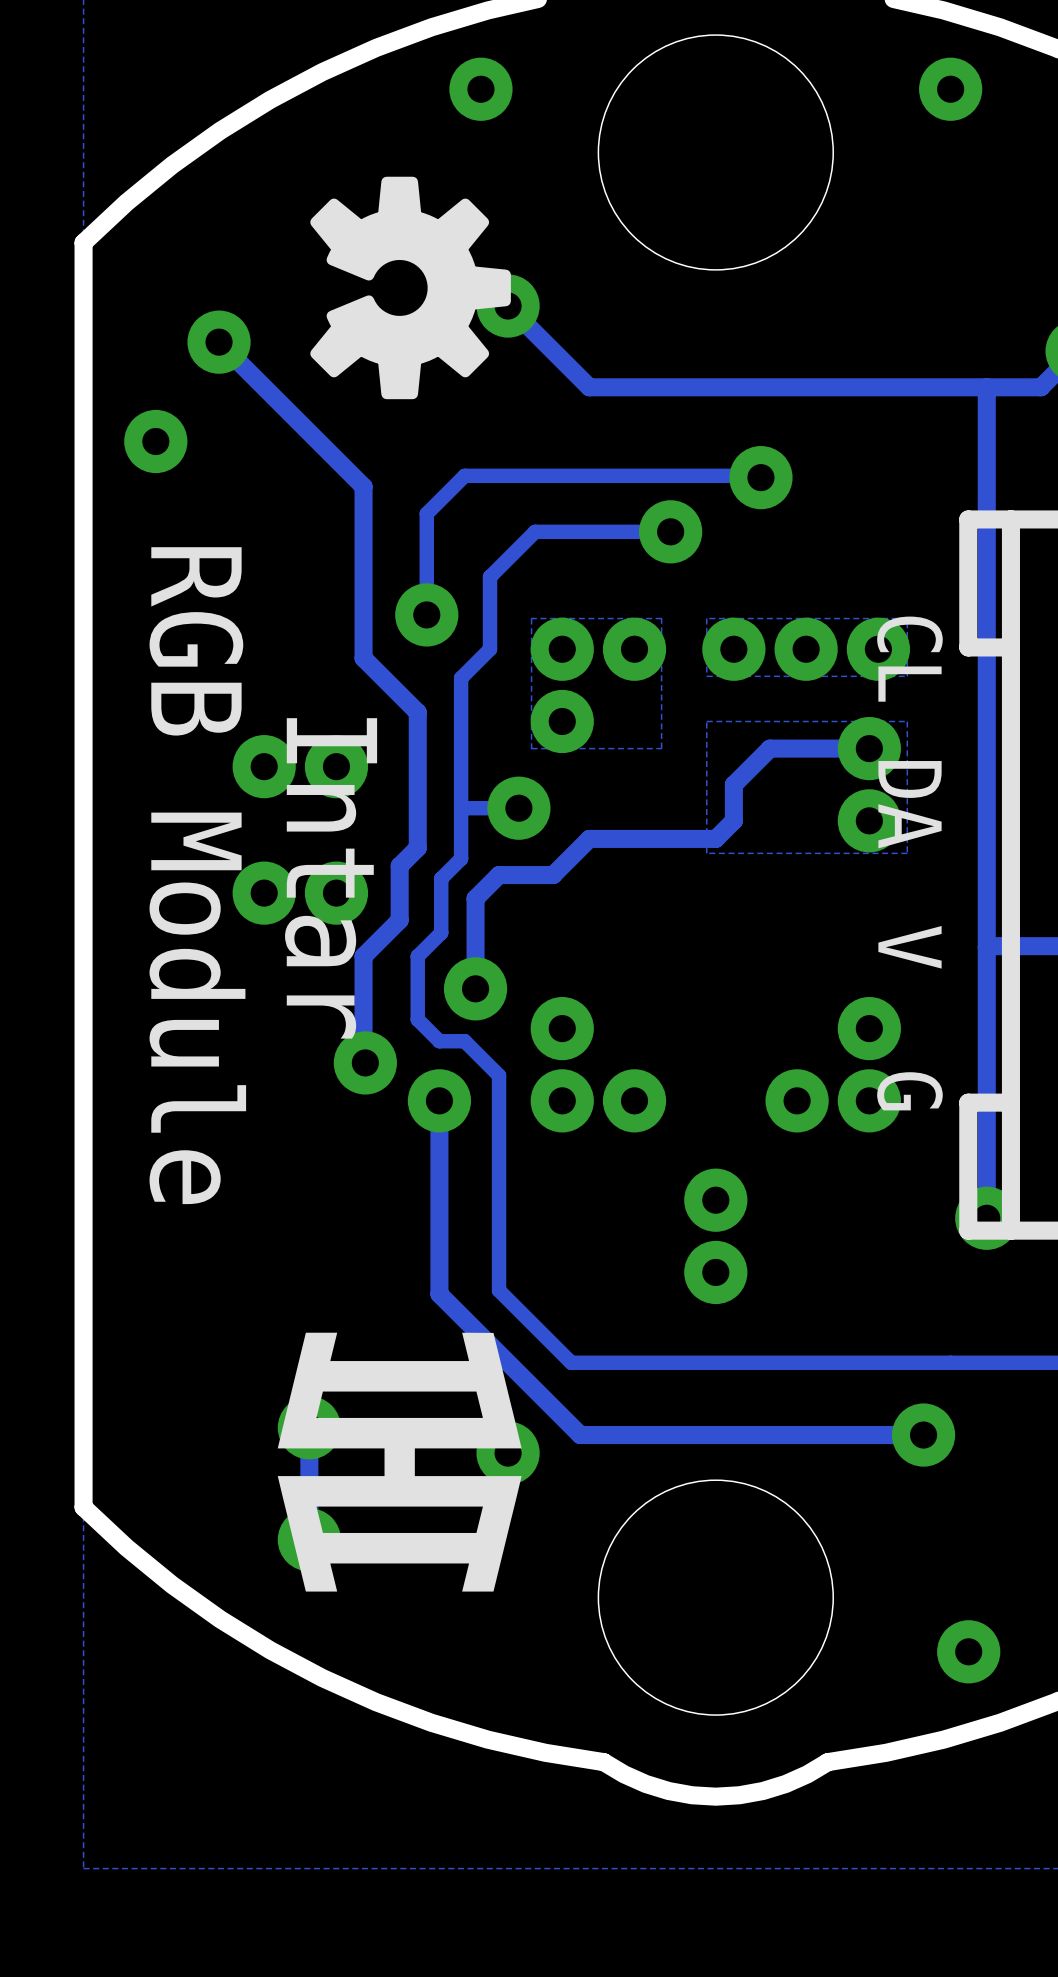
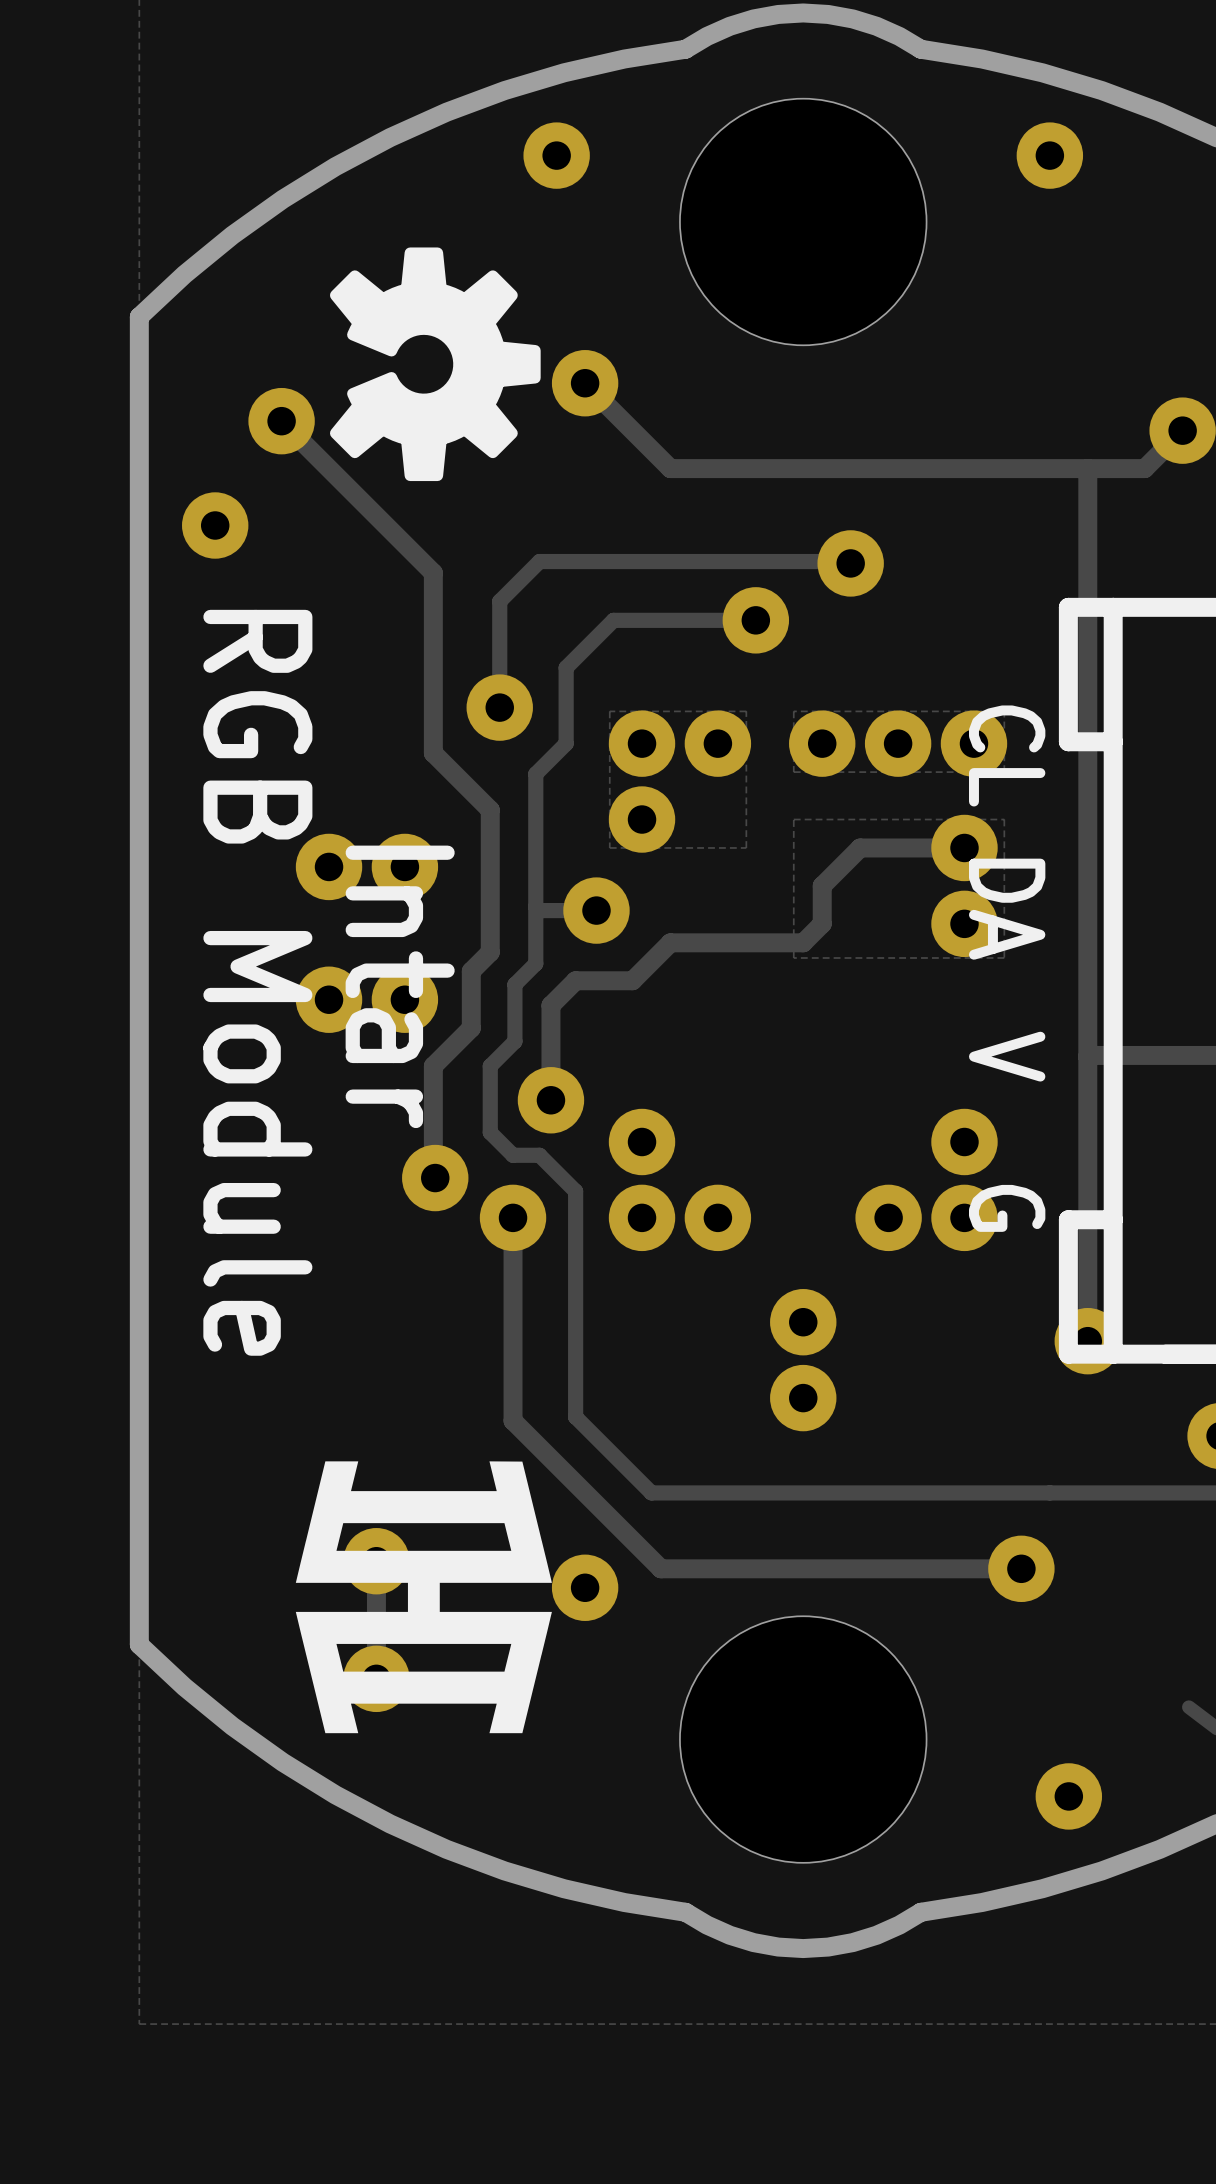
drawing position: (410, 287) -> (435, 364)
drawing position: (399, 1462) -> (423, 1597)

